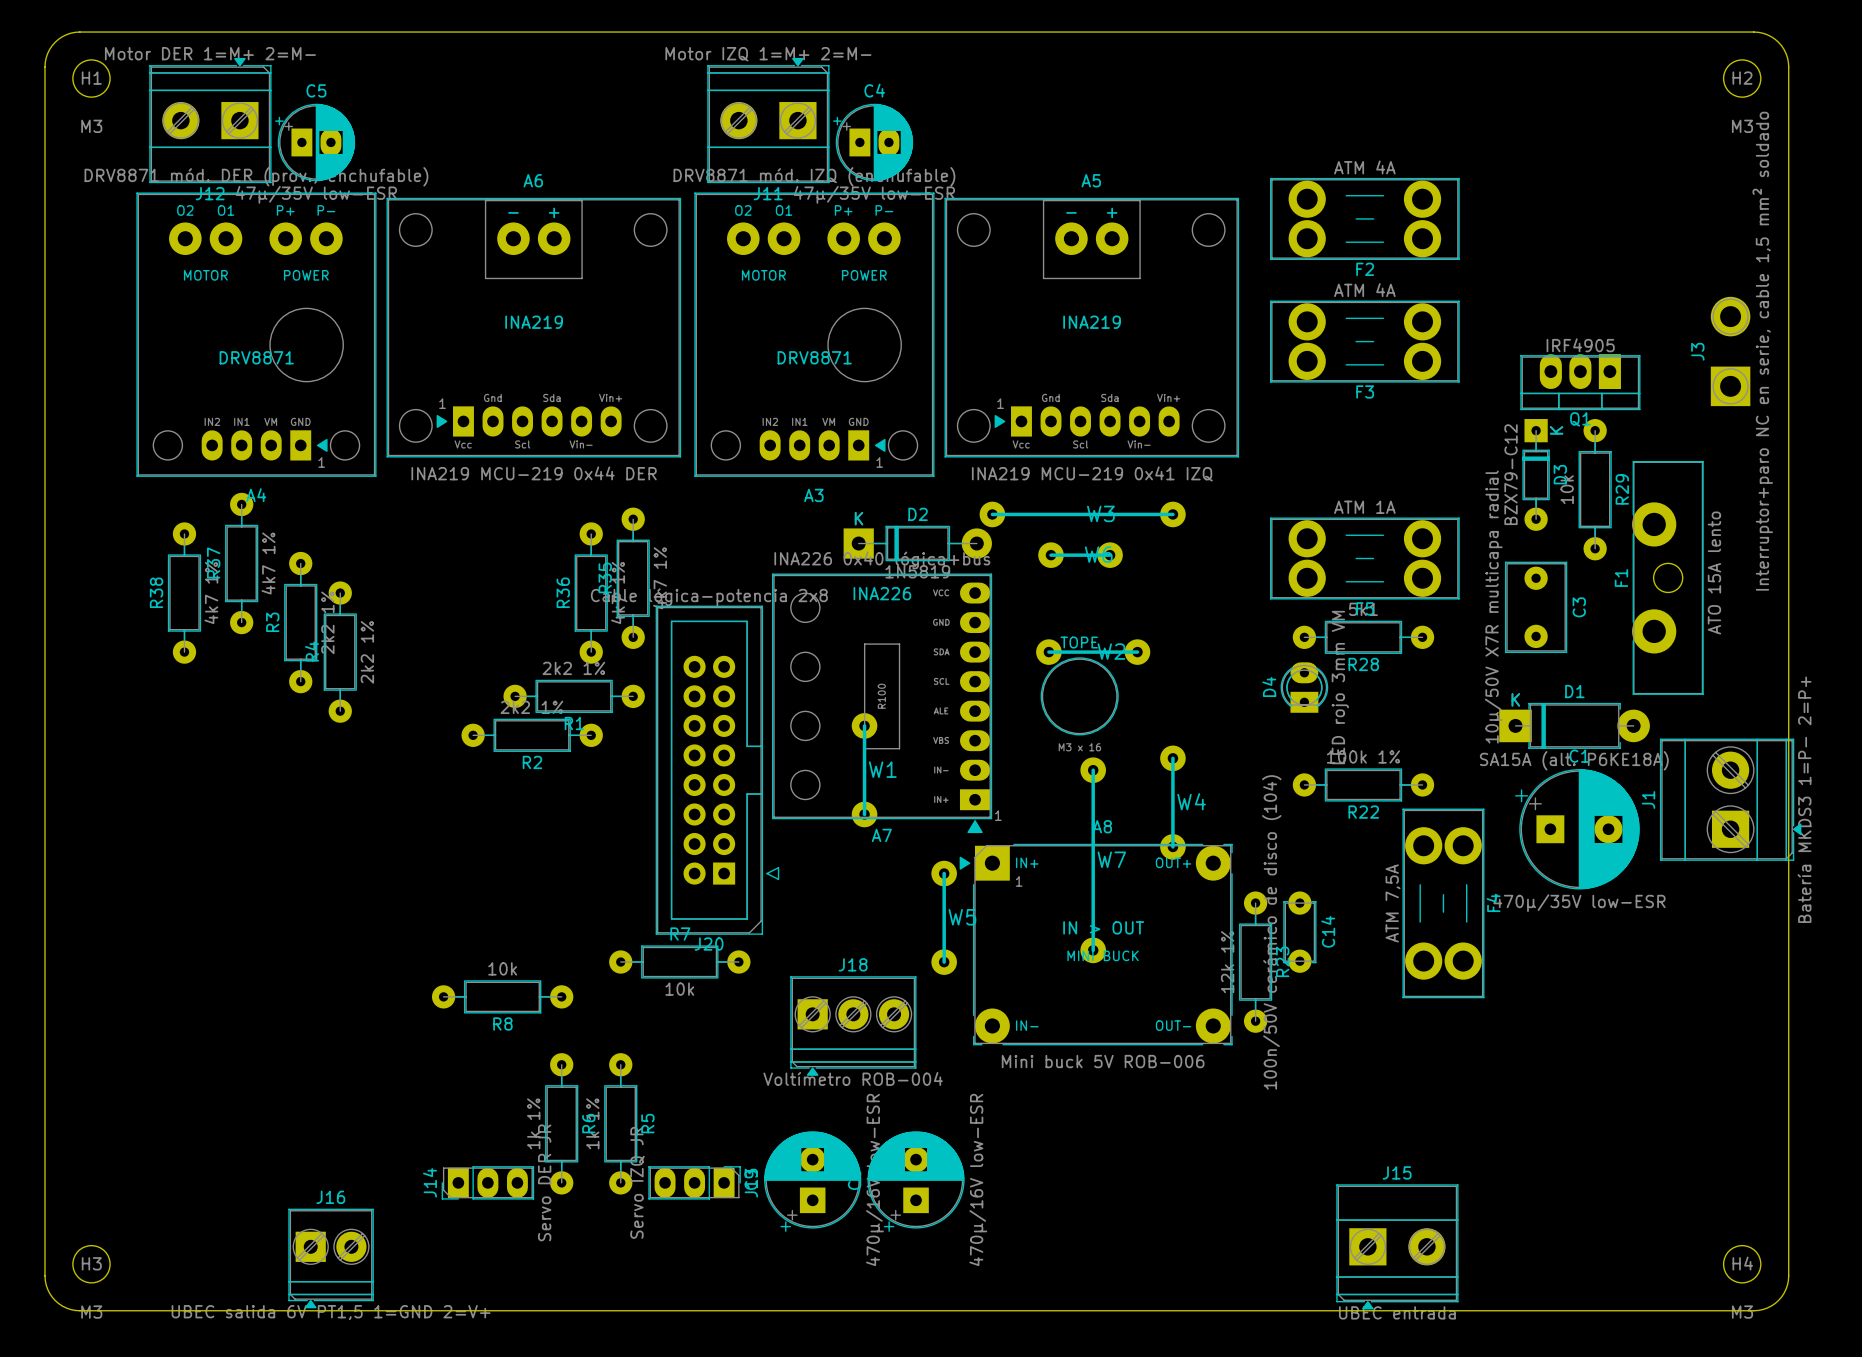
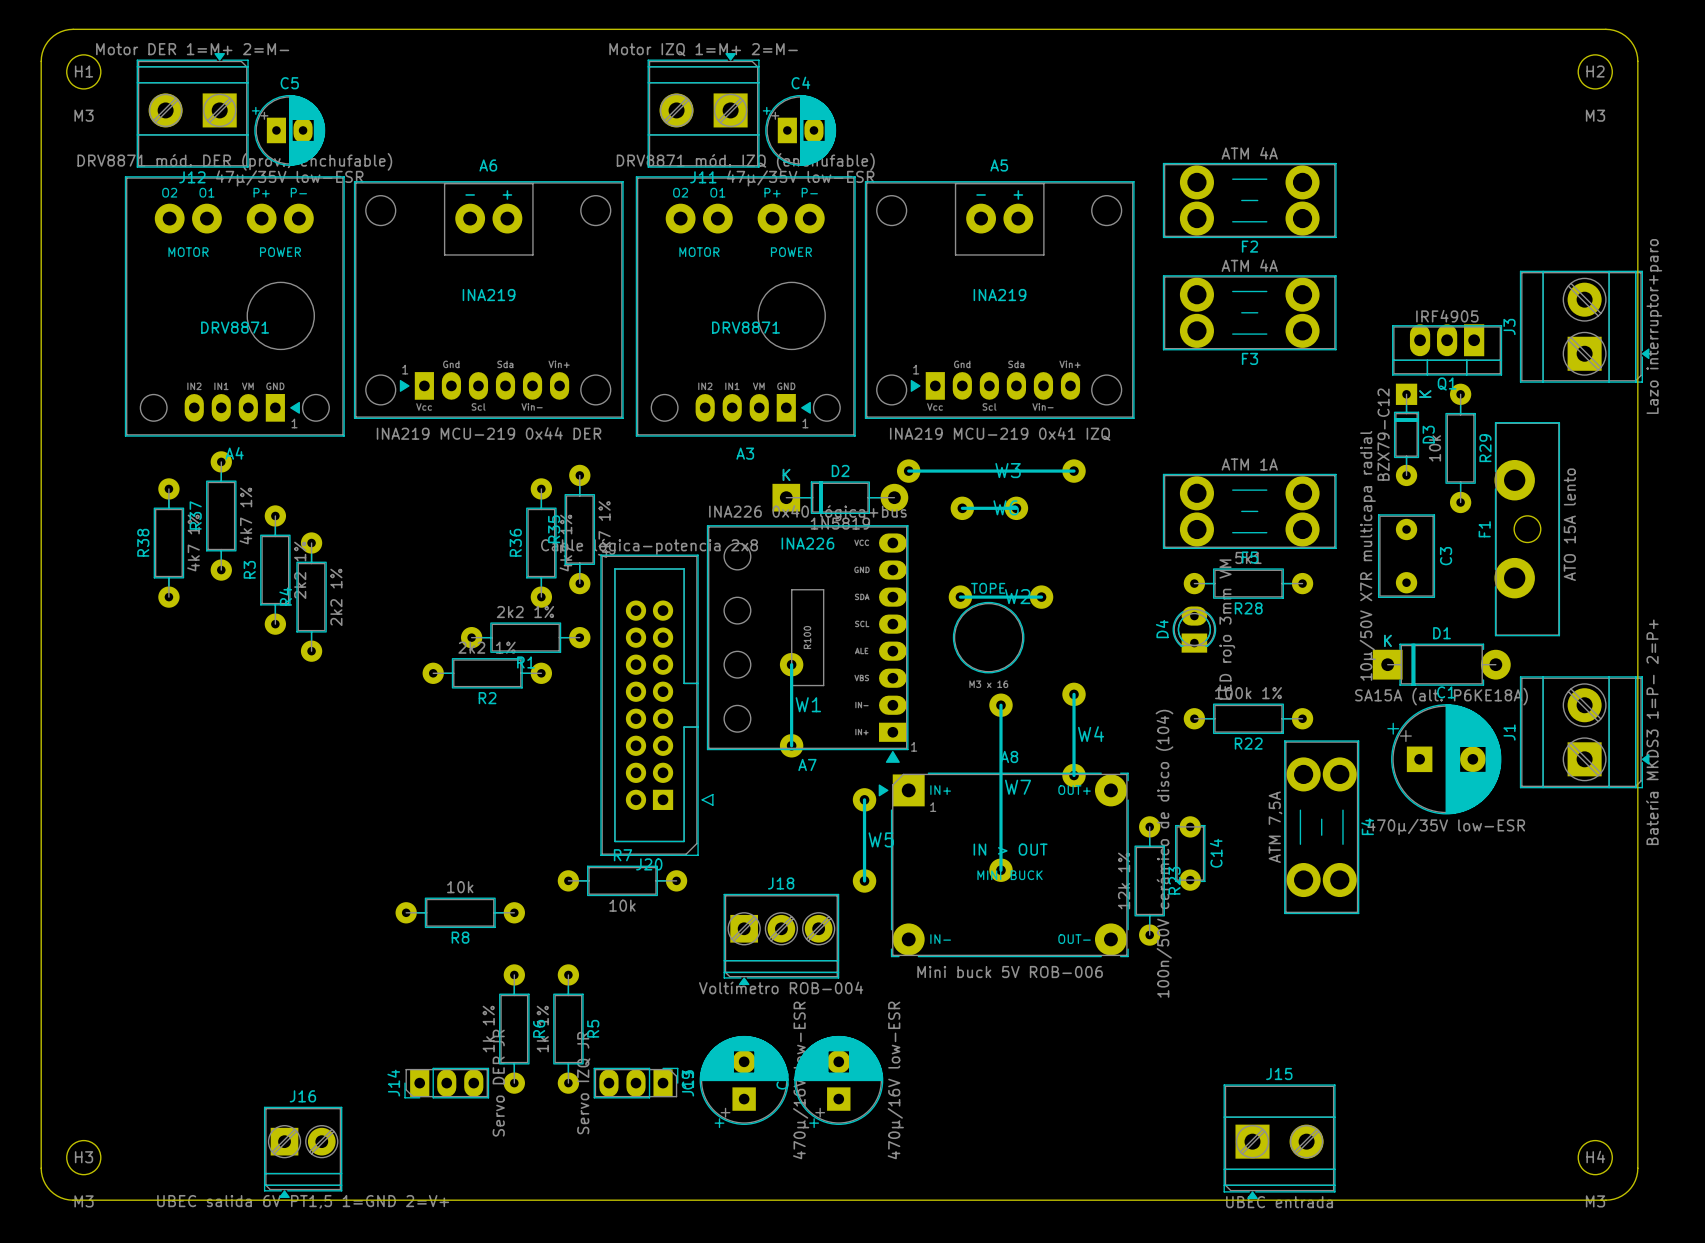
J3 footprint: [1710, 296, 1751, 407] -> [1519, 270, 1650, 383]
J3 name position: J3 (1697, 351) -> J3 (1509, 326)
J3 value: Interruptor+paro NC en serie, cable 1,5 mm² soldado (1762, 351) -> Lazo interruptor+paro (1654, 326)

